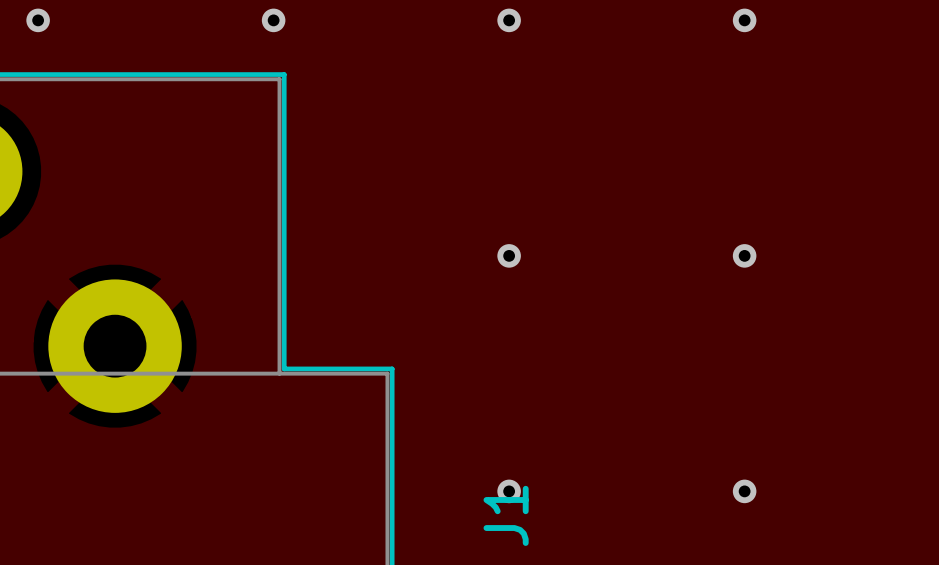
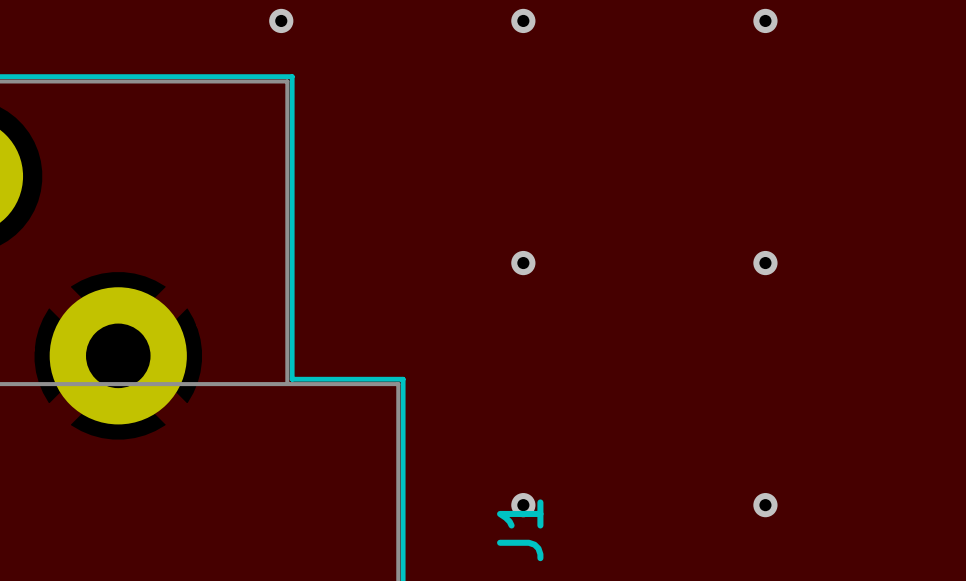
via: (38, 20) -> none

